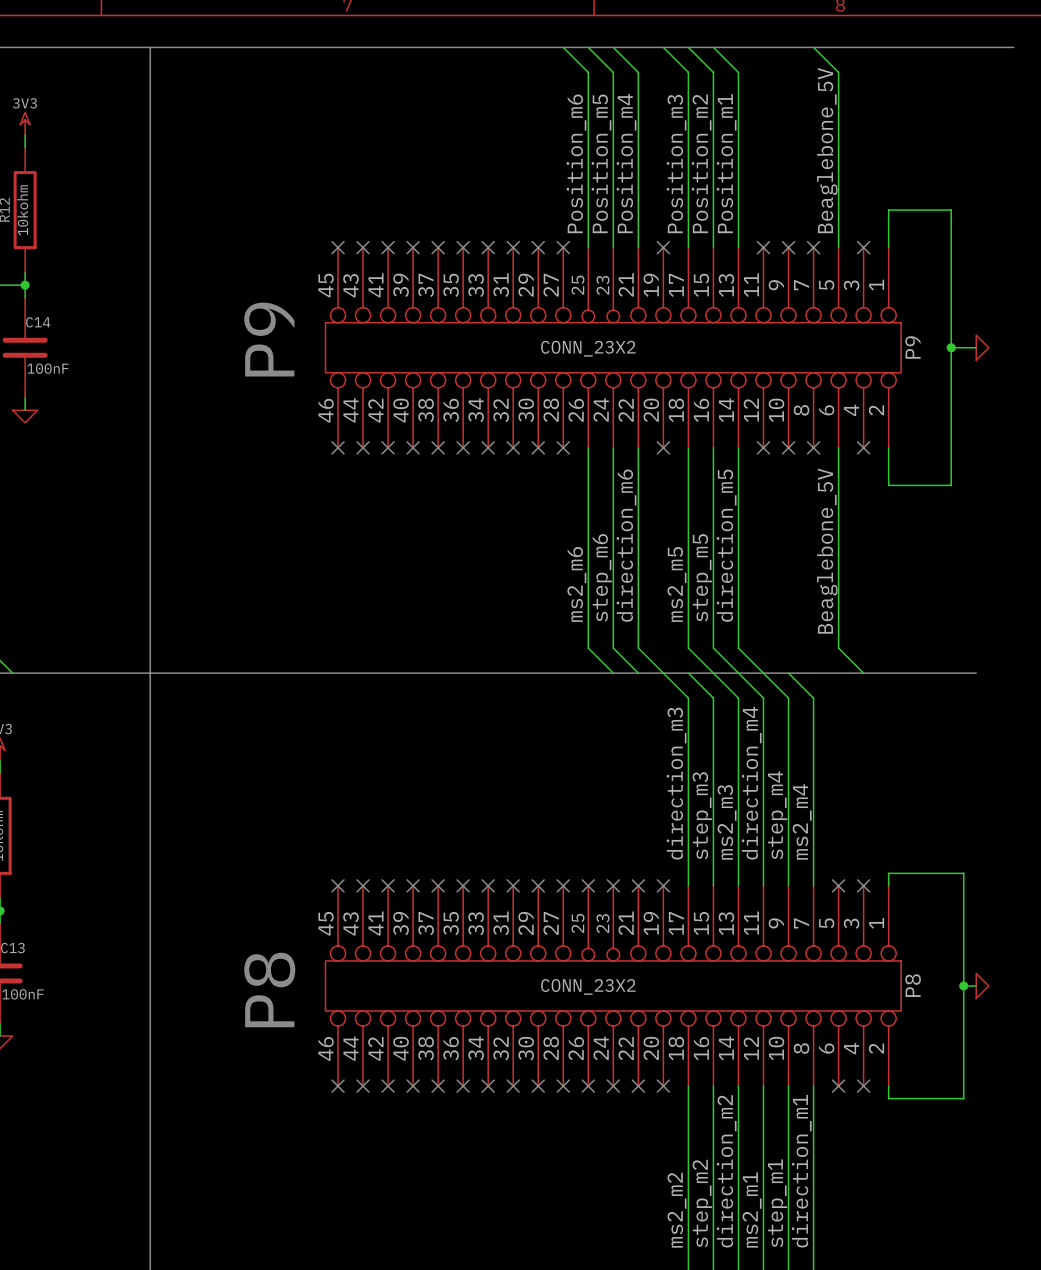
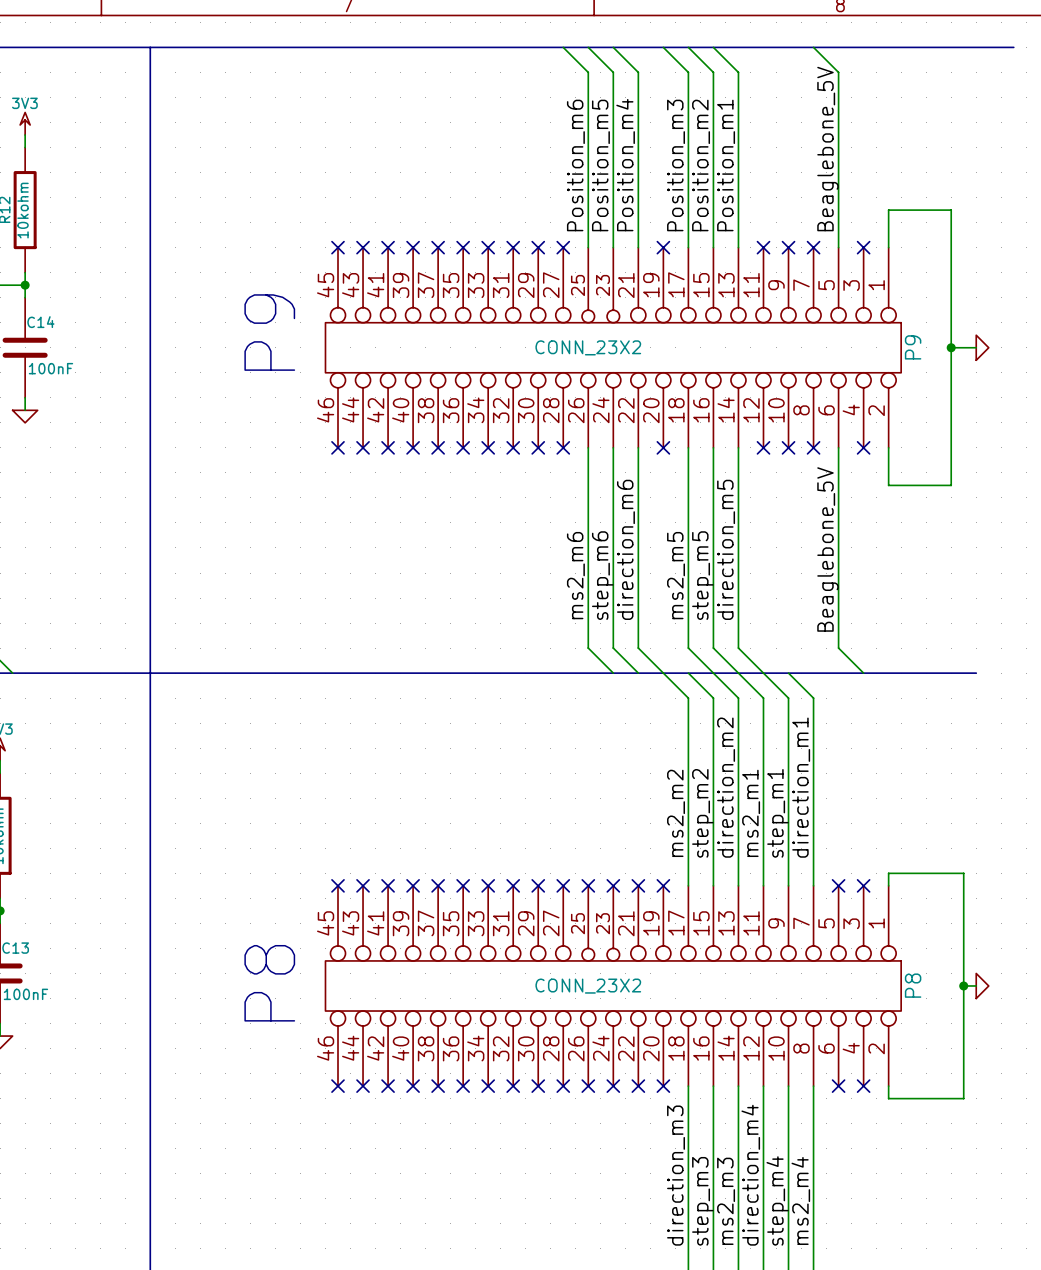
label: direction_m3 (676, 783) -> ms2_m2 (676, 813)
label: direction_m4 (751, 783) -> ms2_m1 (751, 813)
label: step_m3 (702, 815) -> step_m2 (702, 813)
label: step_m4 (777, 815) -> step_m1 (777, 813)
label: ms2_m4 (802, 821) -> direction_m1 (801, 787)
label: ms2_m3 (727, 822) -> direction_m2 (726, 787)
label: direction_m2 (726, 1171) -> ms2_m3 (726, 1201)
label: direction_m1 (801, 1171) -> ms2_m4 (800, 1200)
label: step_m2 (702, 1203) -> step_m3 (702, 1201)
label: step_m1 (777, 1203) -> step_m4 (777, 1200)
label: ms2_m1 (752, 1209) -> direction_m4 (750, 1175)
label: ms2_m2 (676, 1210) -> direction_m3 (676, 1175)

